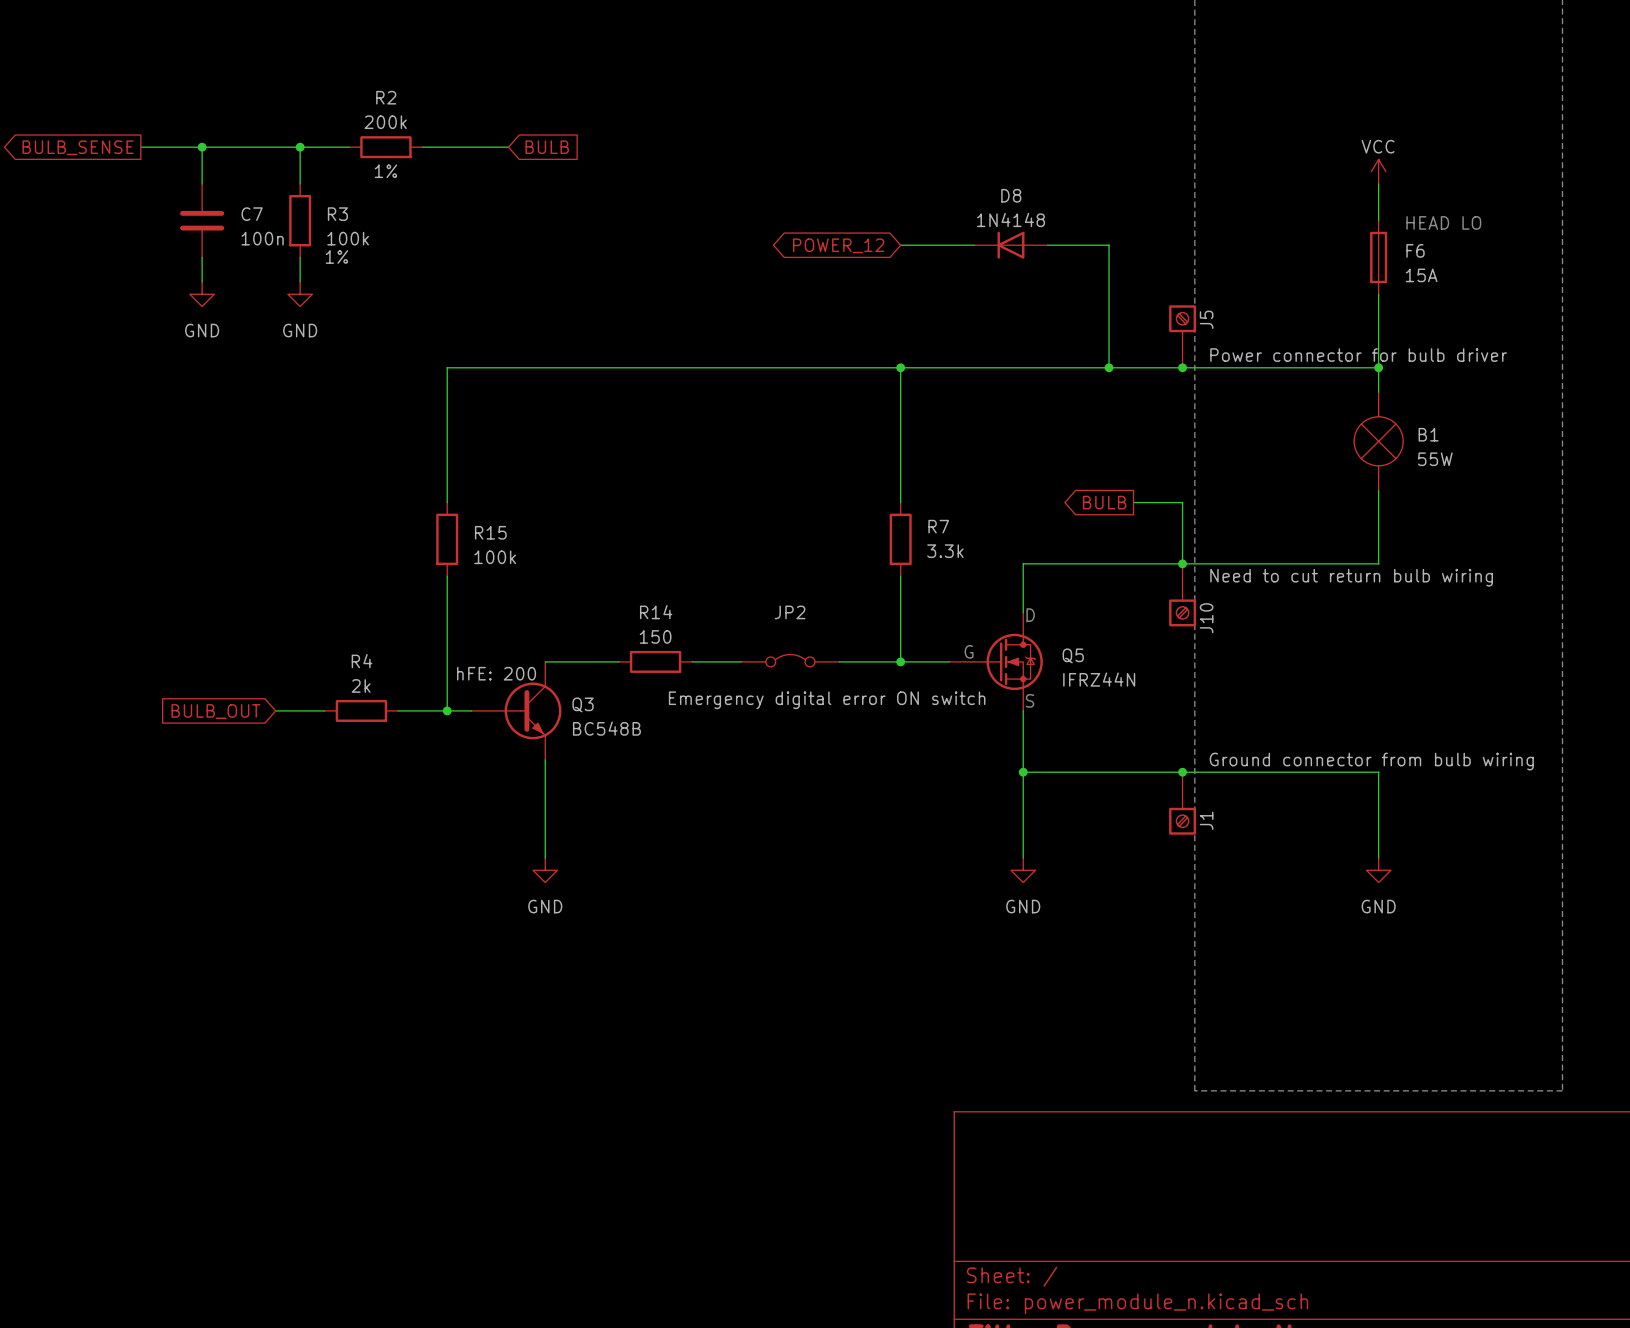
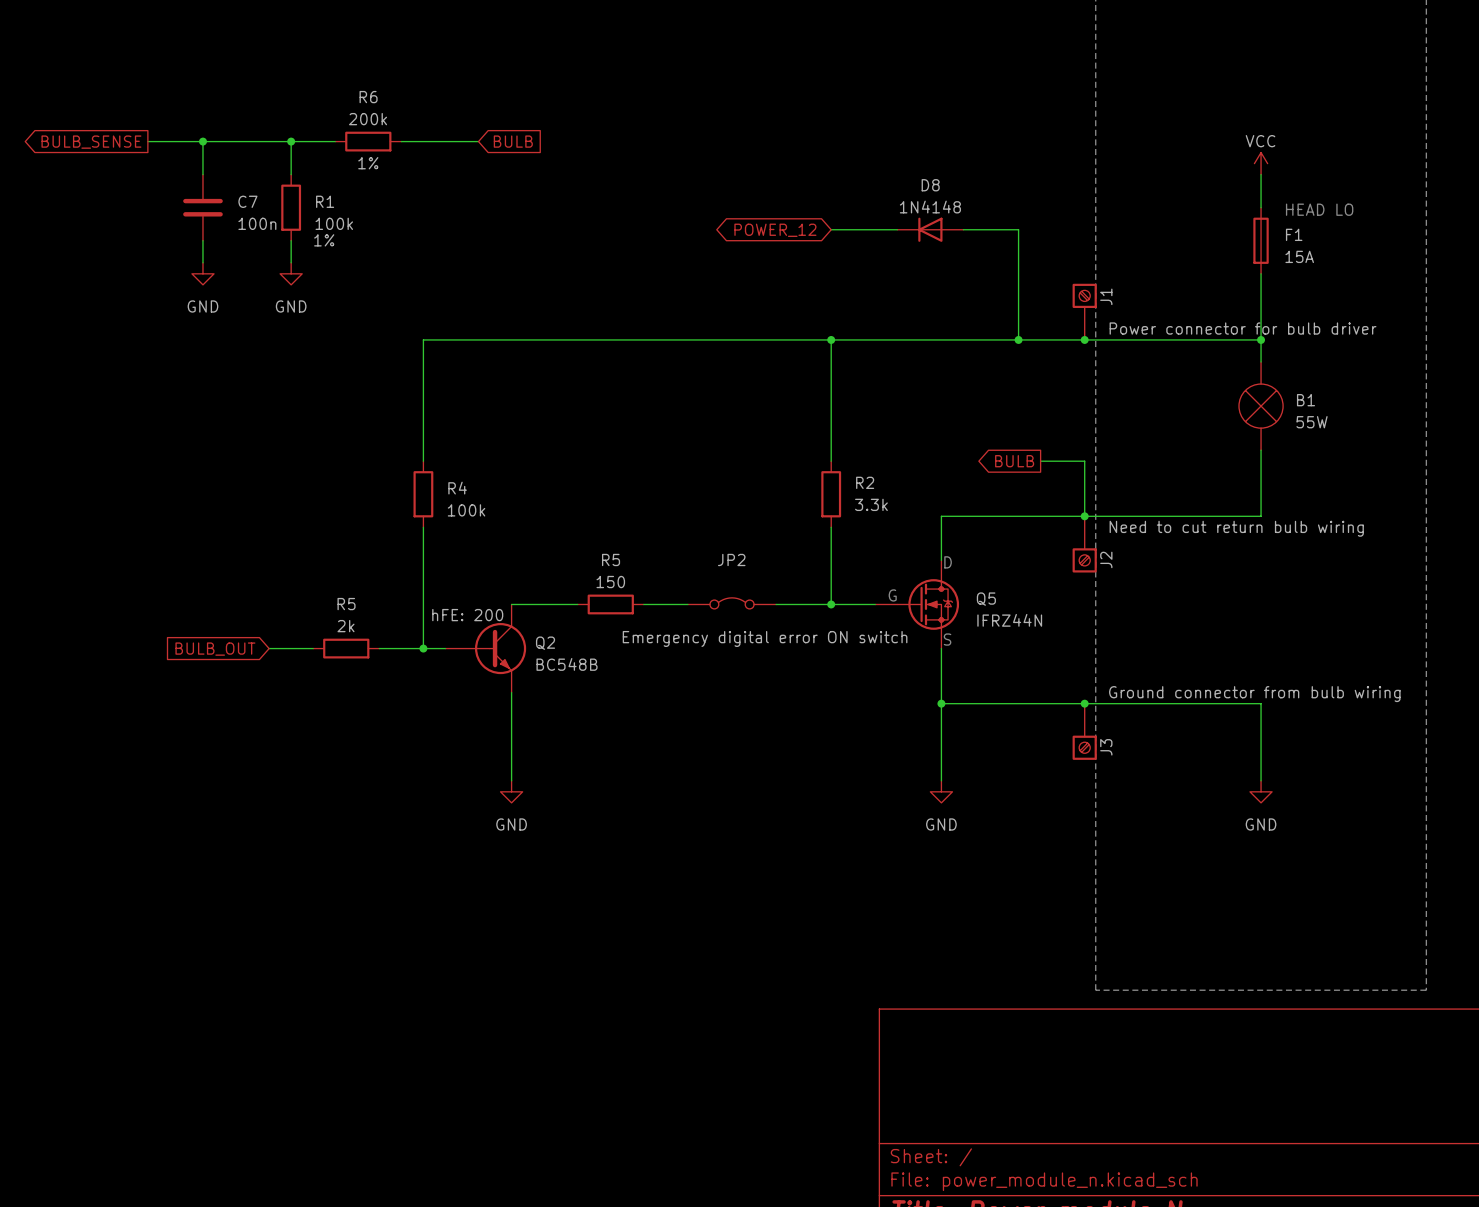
R2 name: R2 (386, 97) -> R6 (368, 97)
R3 name: R3 (337, 214) -> R1 (325, 201)
F6 name: F6 (1415, 250) -> F1 (1294, 234)
J5 name: J5 (1206, 319) -> J1 (1106, 296)
R7 name: R7 (938, 526) -> R2 (865, 482)
R15 name: R15 (490, 532) -> R4 (457, 488)
R14 name: R14 (656, 612) -> R5 (611, 559)
J10 name: J10 (1206, 618) -> J2 (1106, 559)
R4 name: R4 (362, 661) -> R5 (346, 604)
Q3 name: Q3 (583, 704) -> Q2 (545, 643)
J1 name: J1 (1206, 820) -> J3 (1106, 747)

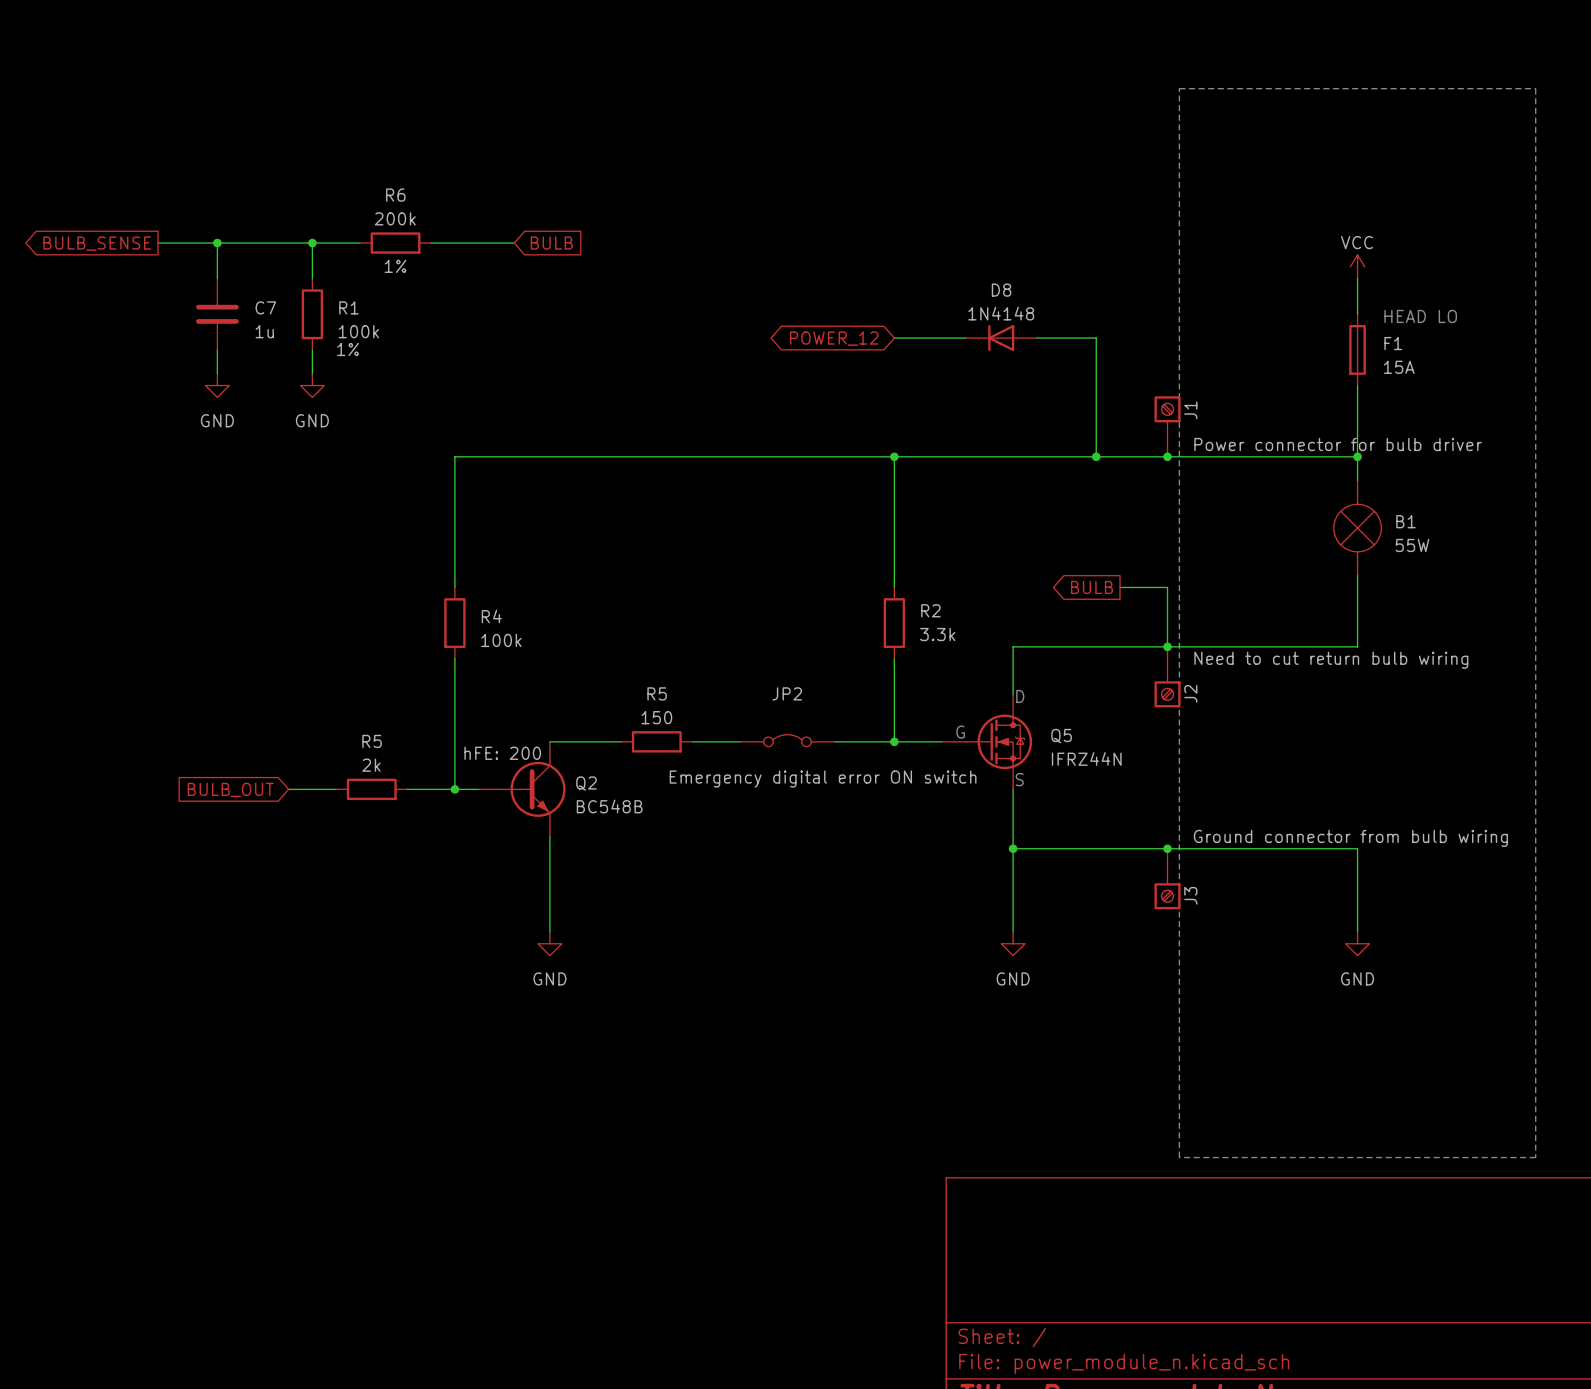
C7 value: 100n (257, 223) -> 1u (264, 331)

